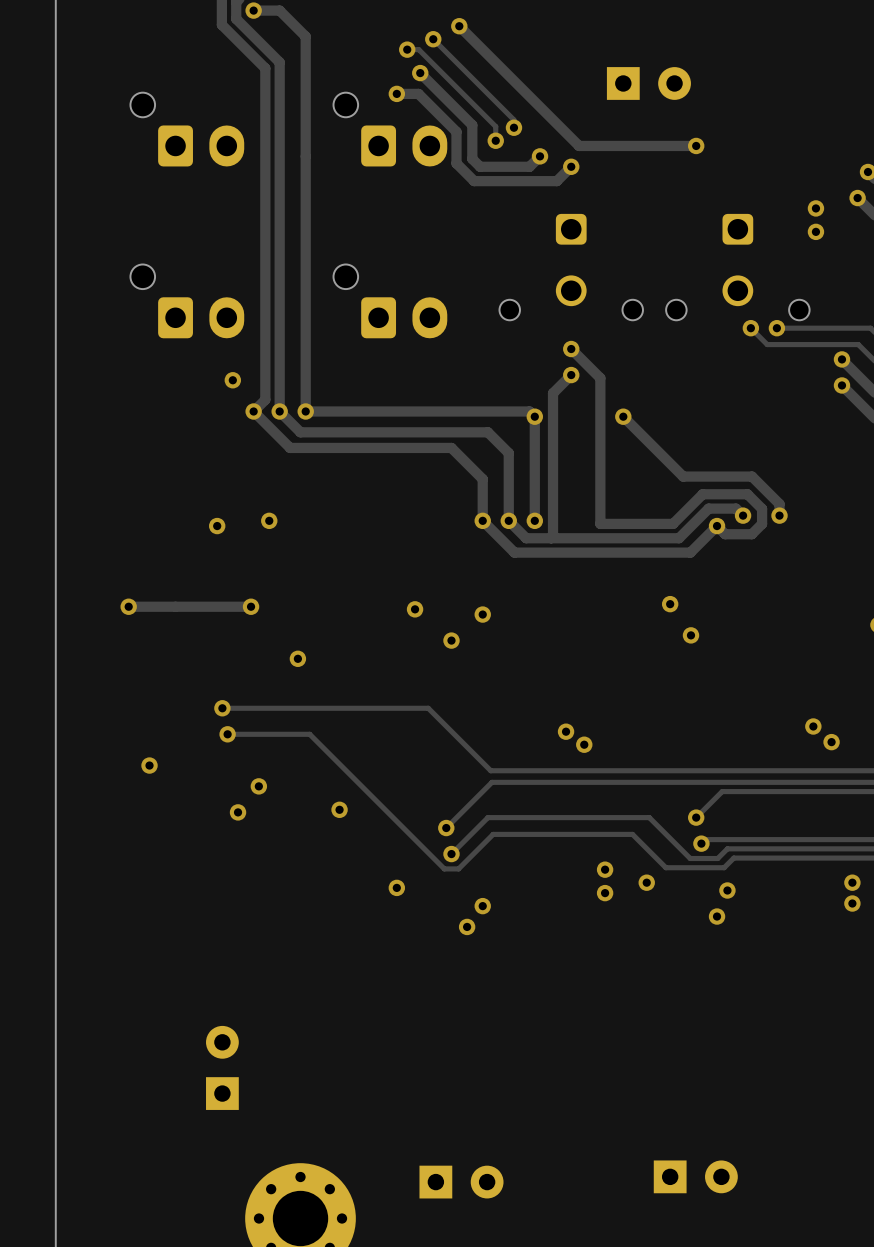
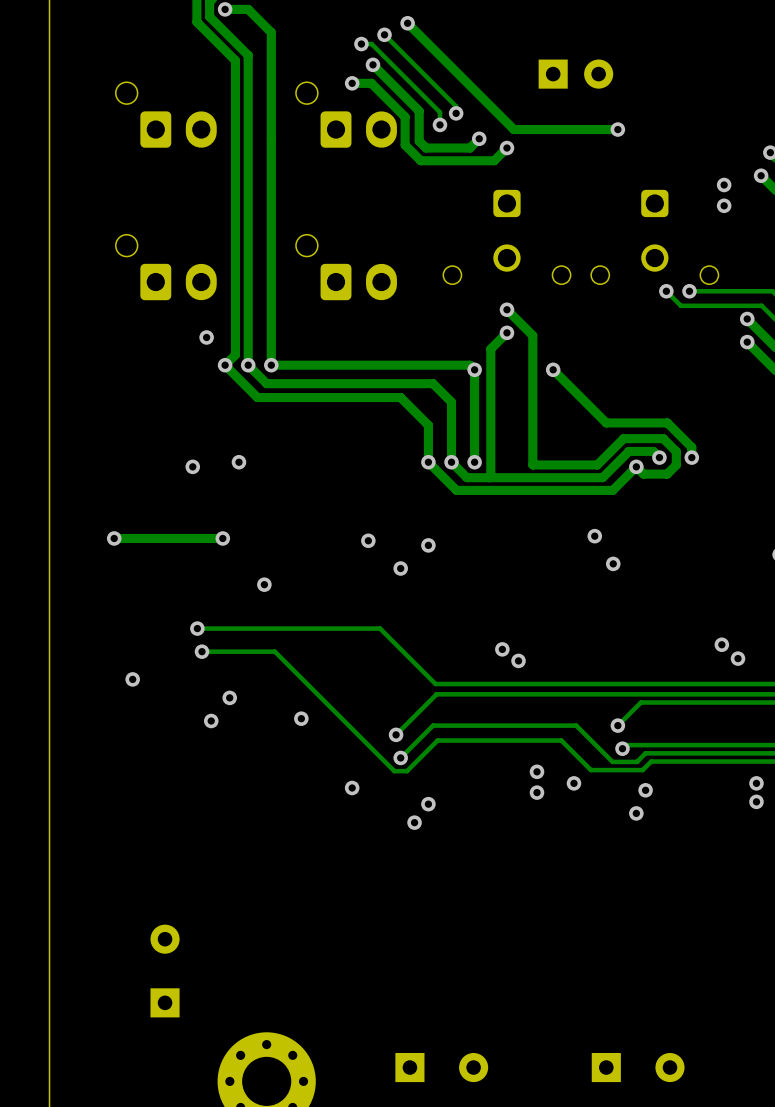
part: (222, 1067) -> none
part: none -> (165, 971)
part: (695, 1176) -> none
part: (461, 1182) -> none
part: none -> (441, 1067)
part: none -> (638, 1067)

